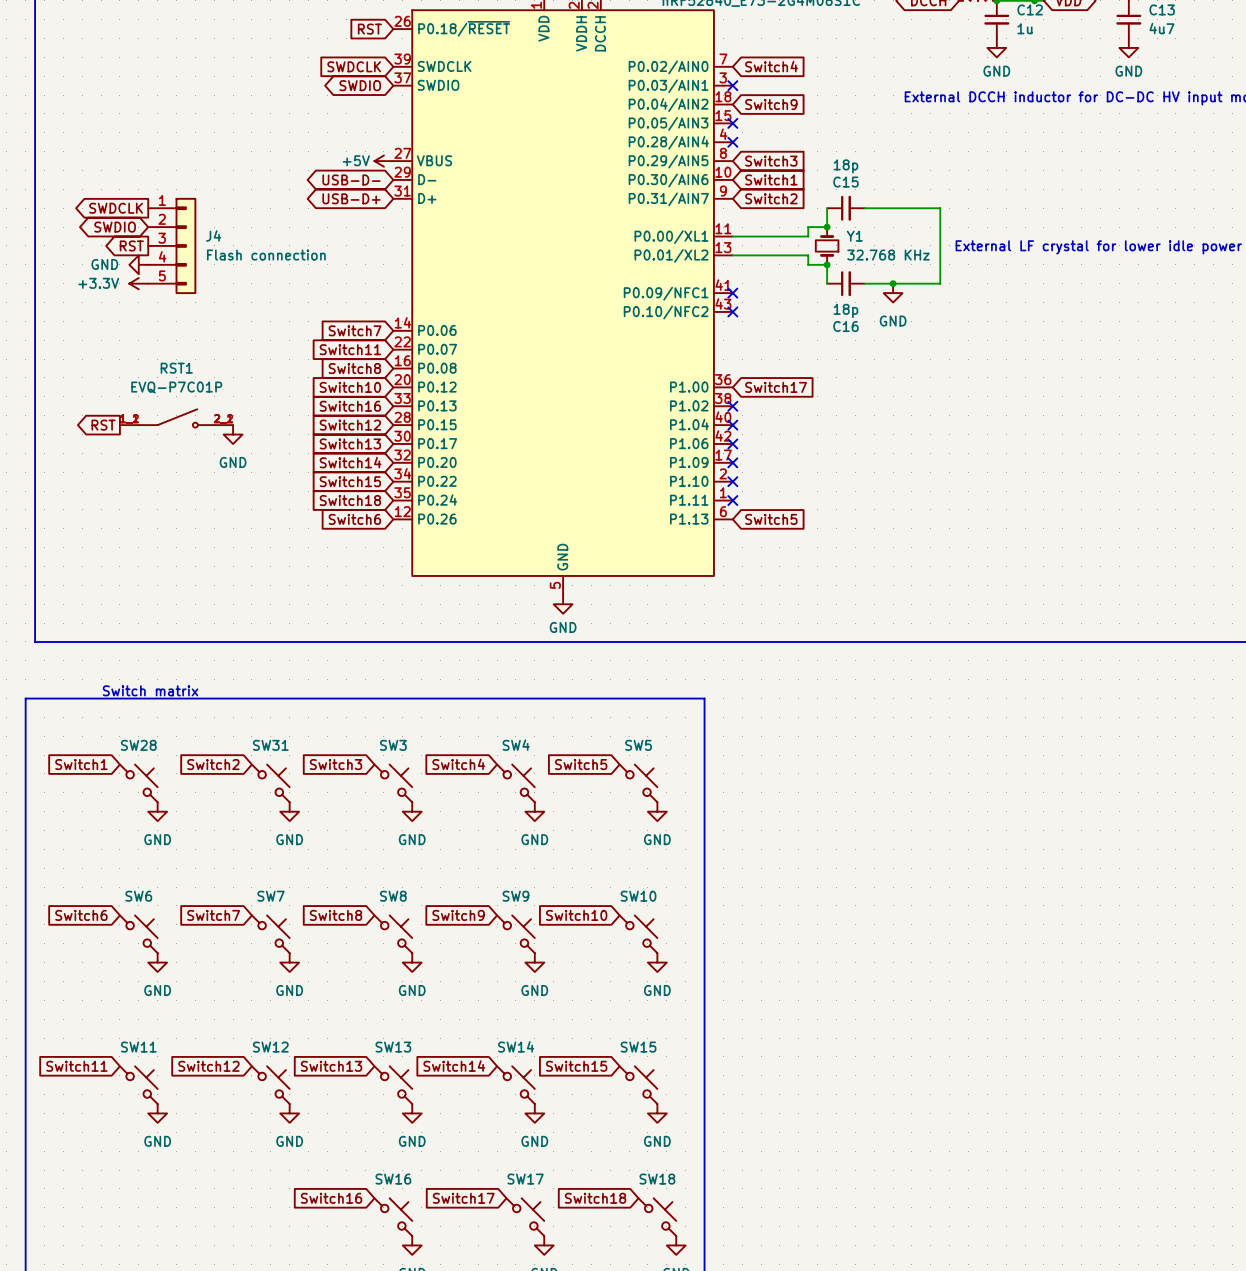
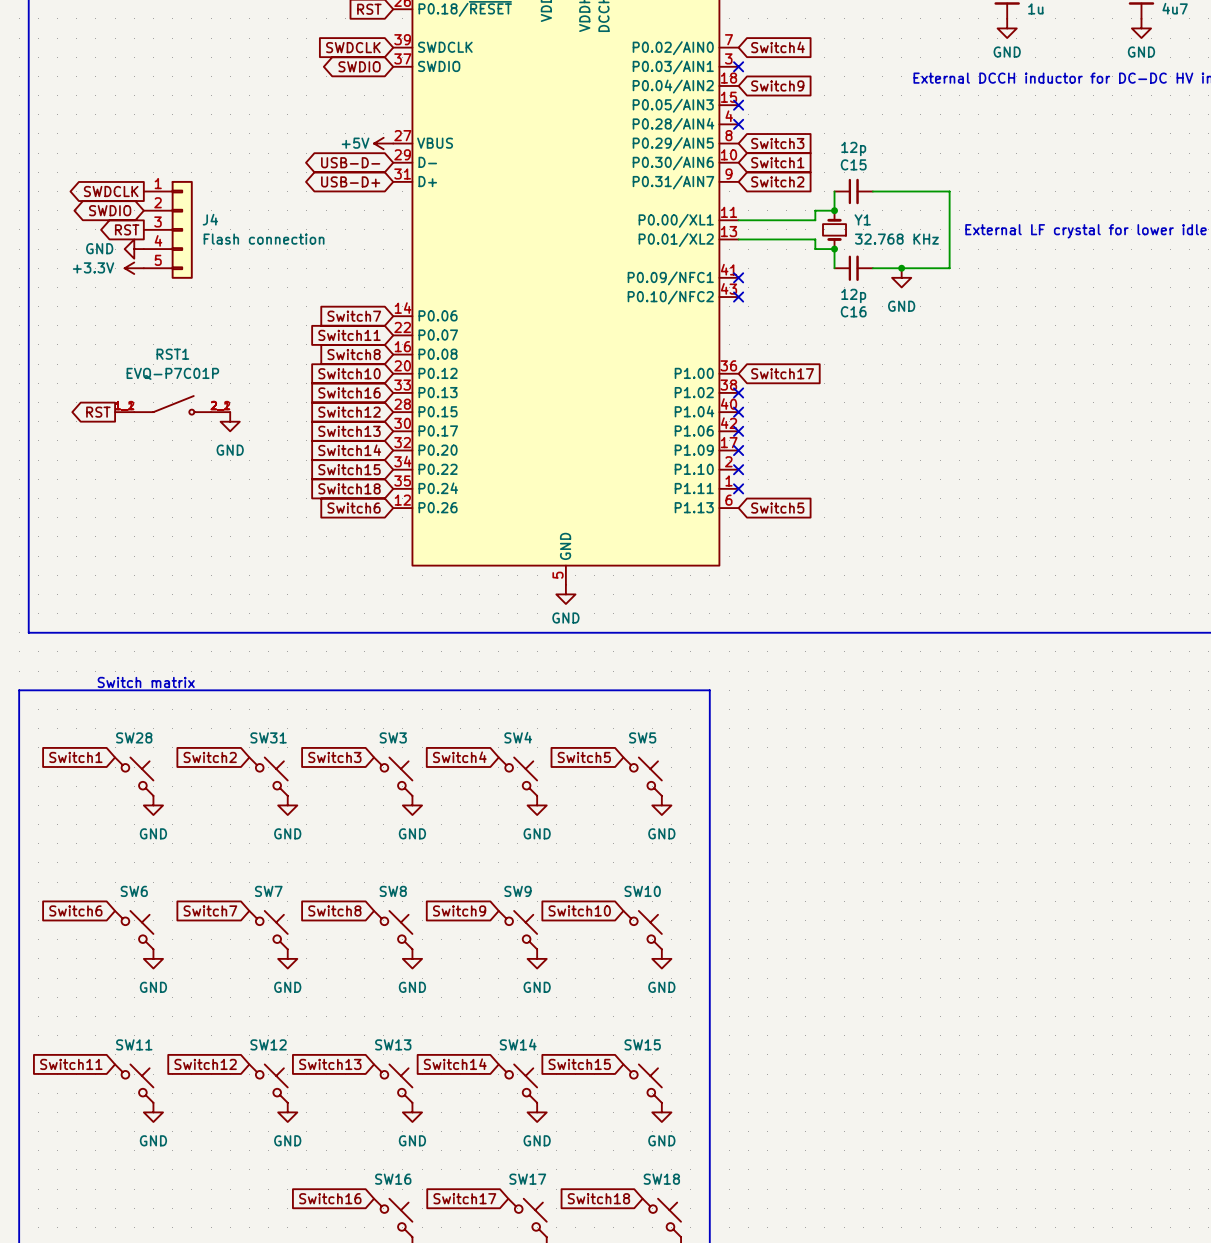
C15 value: 18p (845, 166) -> 12p (853, 149)
C16 value: 18p (845, 310) -> 12p (853, 295)

